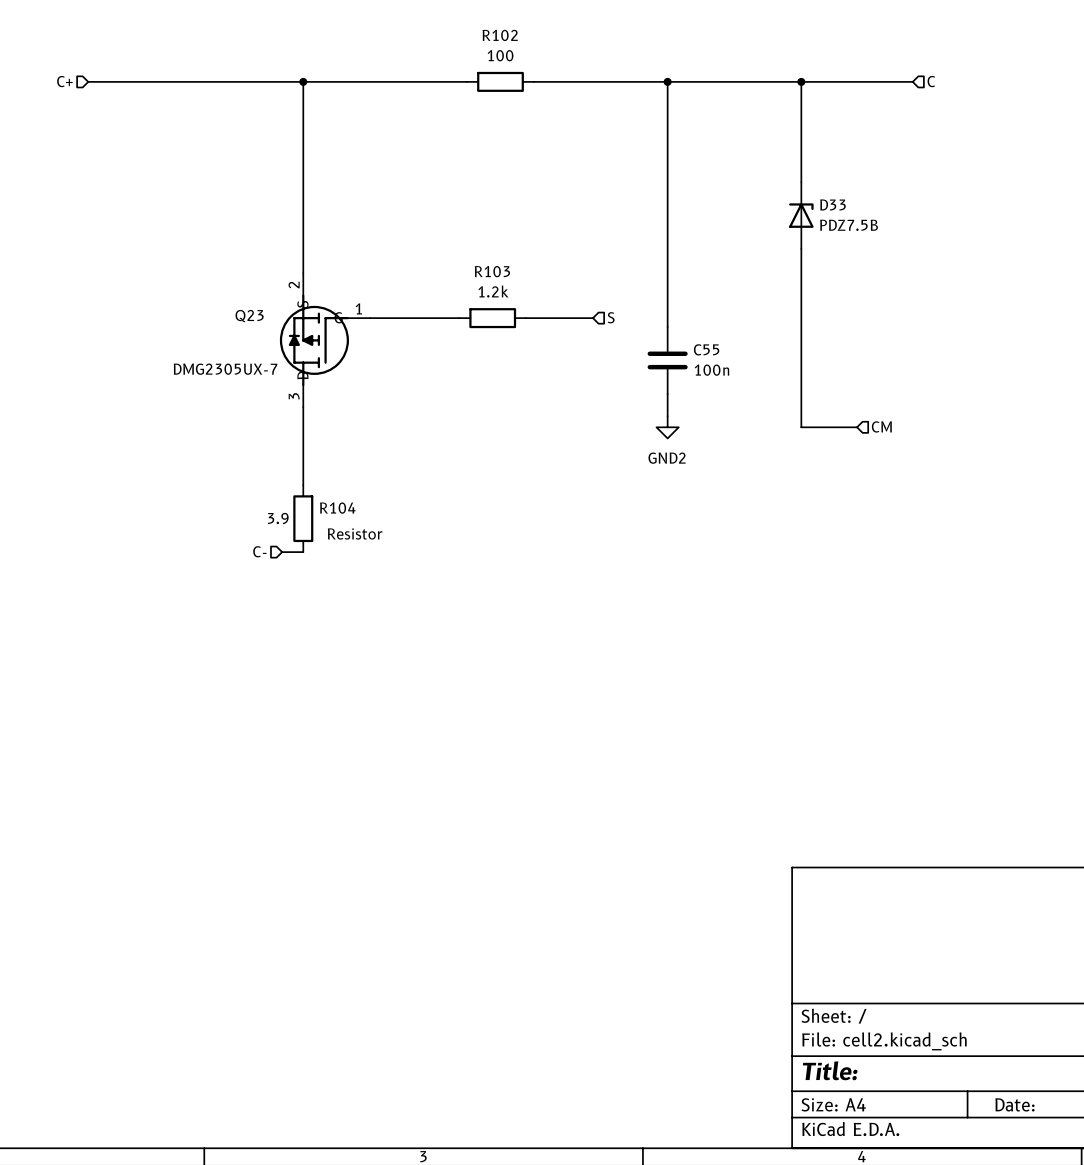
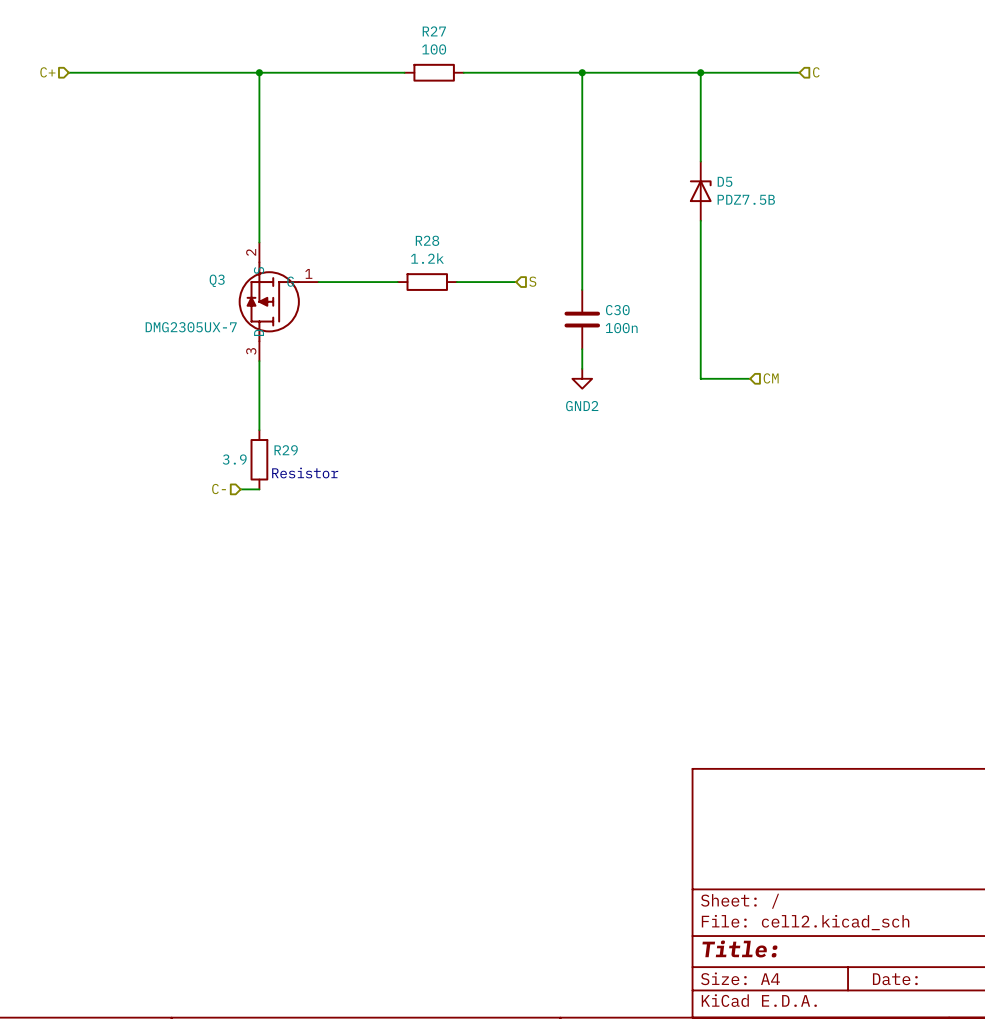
R102 name: R102 (500, 35) -> R27 (434, 31)
D33 name: D33 (832, 204) -> D5 (725, 181)
R103 name: R103 (492, 271) -> R28 (427, 240)
Q23 name: Q23 (249, 316) -> Q3 (217, 280)
C55 name: C55 (706, 349) -> C30 (617, 310)
R104 name: R104 (337, 508) -> R29 (286, 450)

